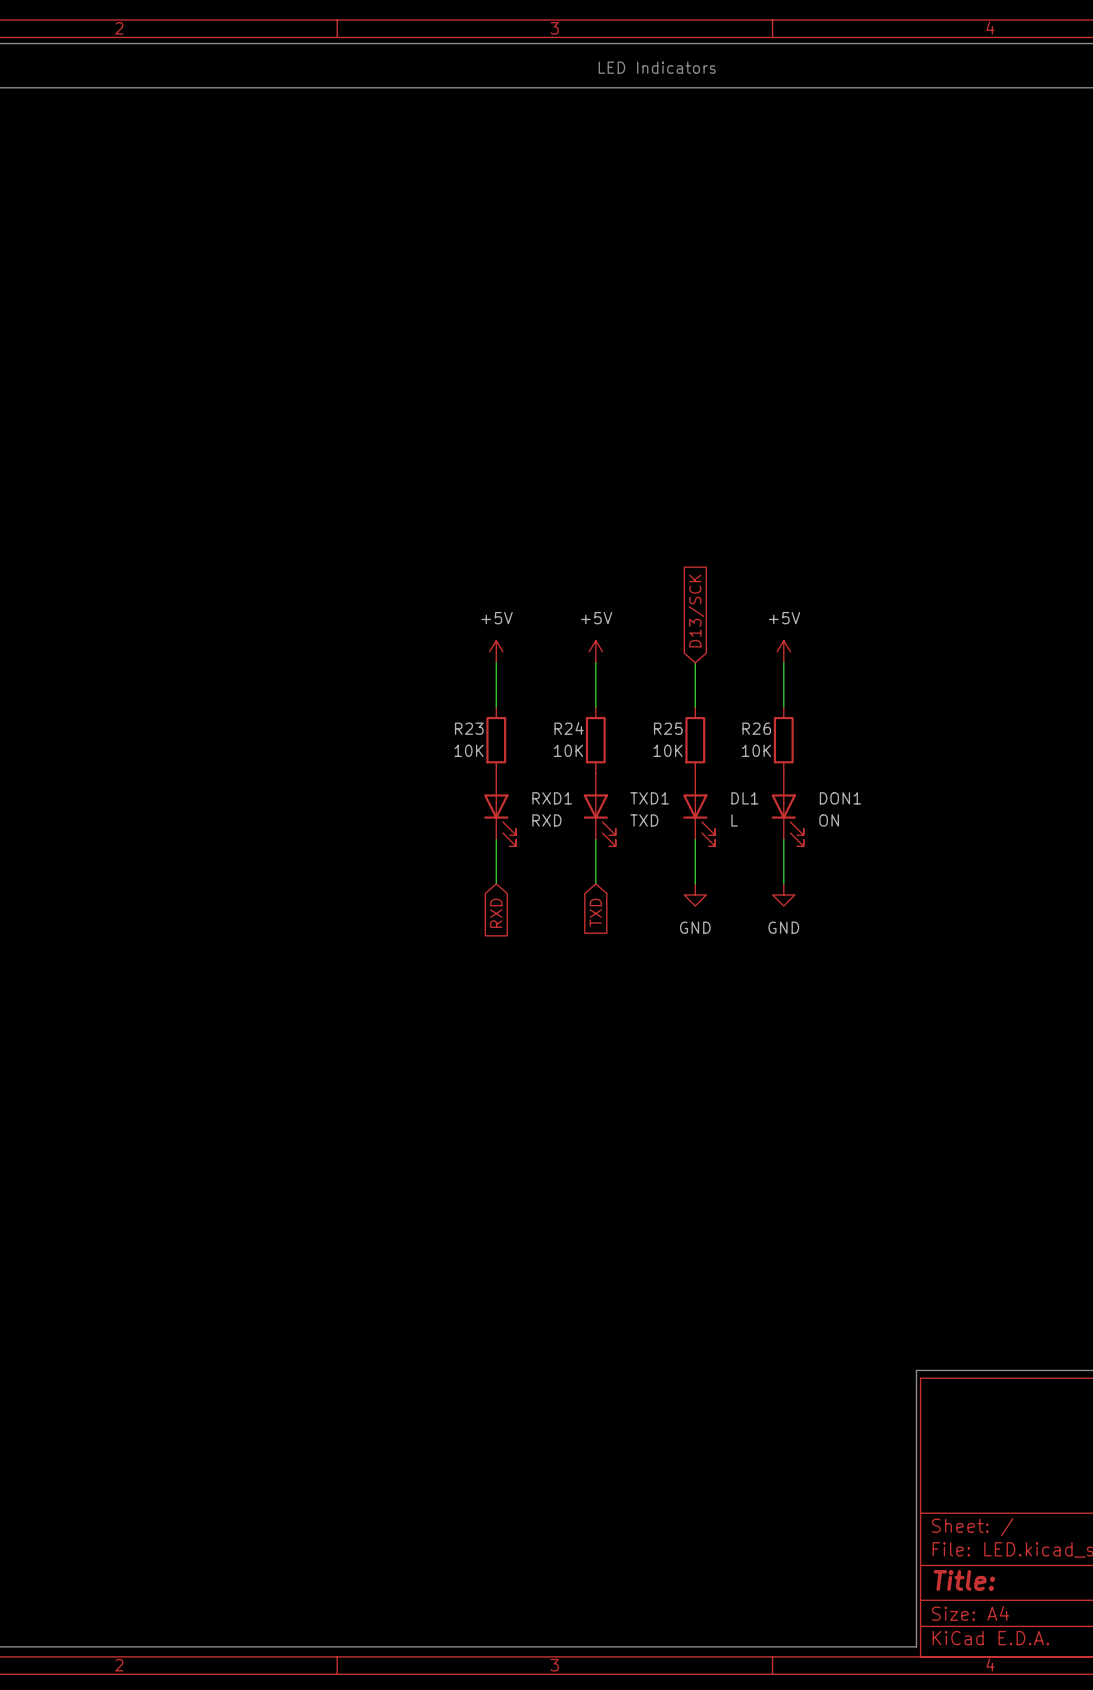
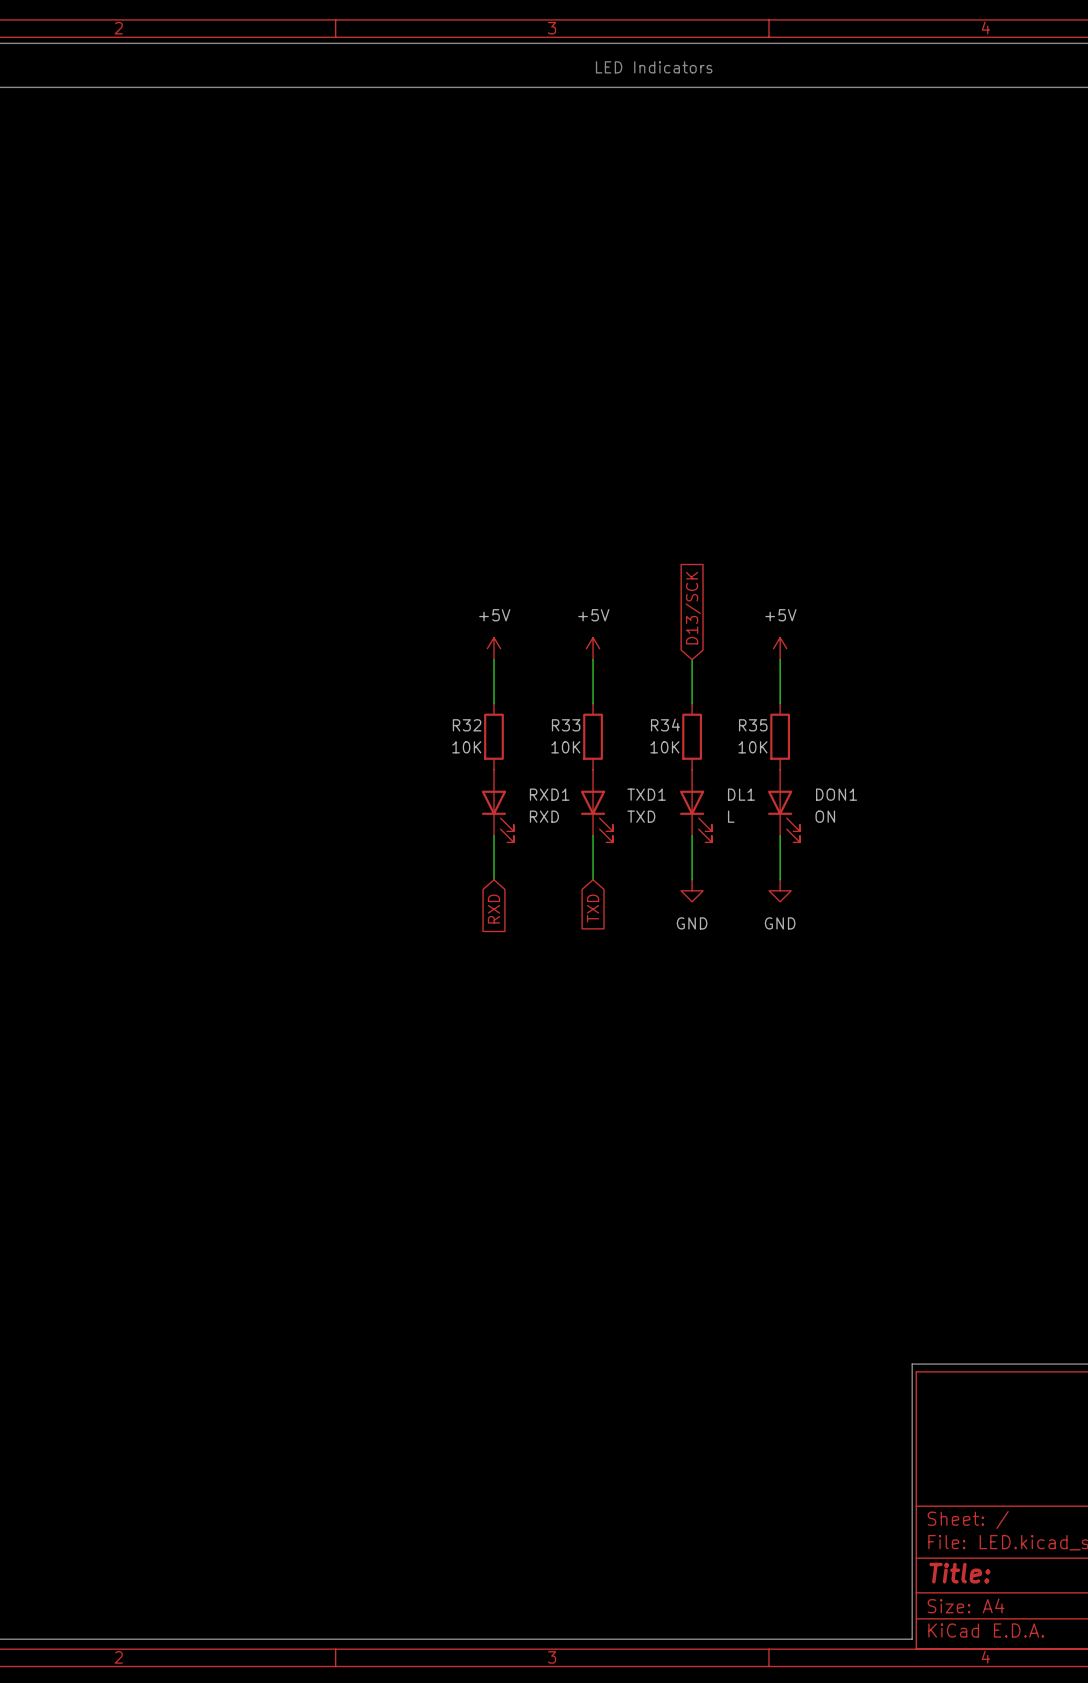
R23 name: R23 (469, 728) -> R32 (467, 725)
R24 name: R24 (569, 728) -> R33 (566, 725)
R25 name: R25 (668, 728) -> R34 (665, 725)
R26 name: R26 (756, 728) -> R35 (753, 725)

